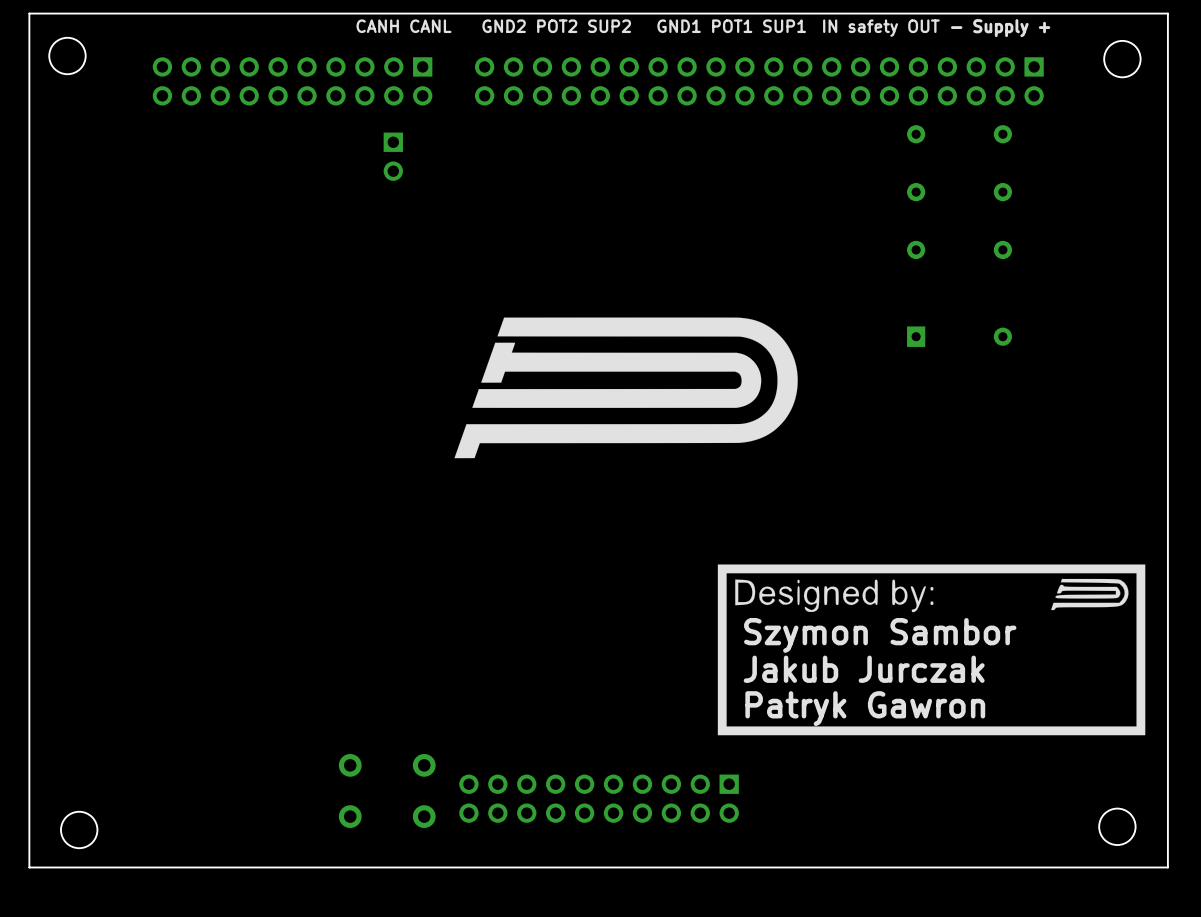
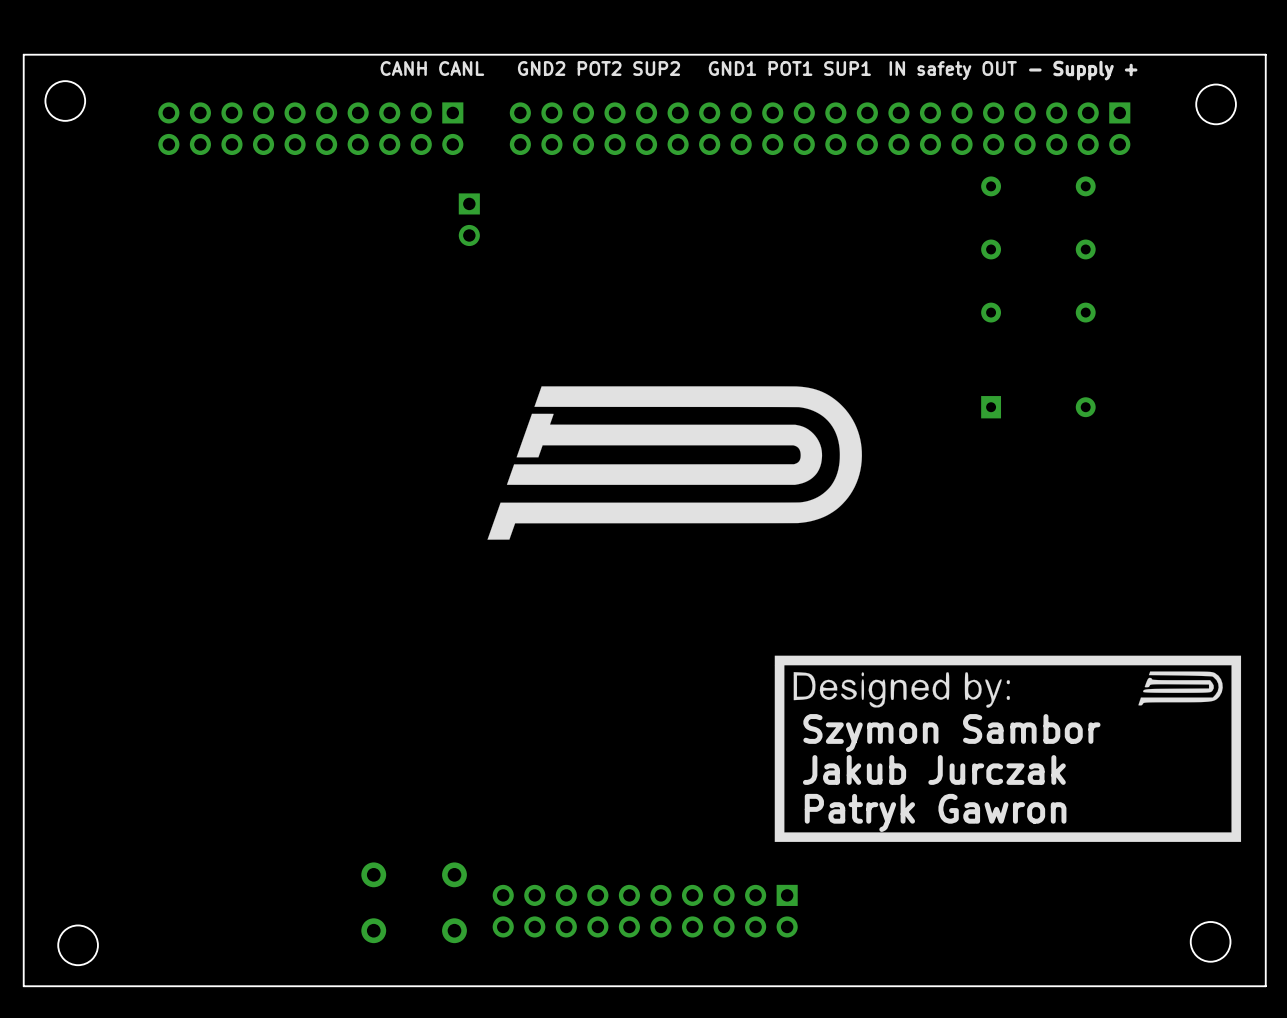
part position: (393, 156) -> (469, 219)

